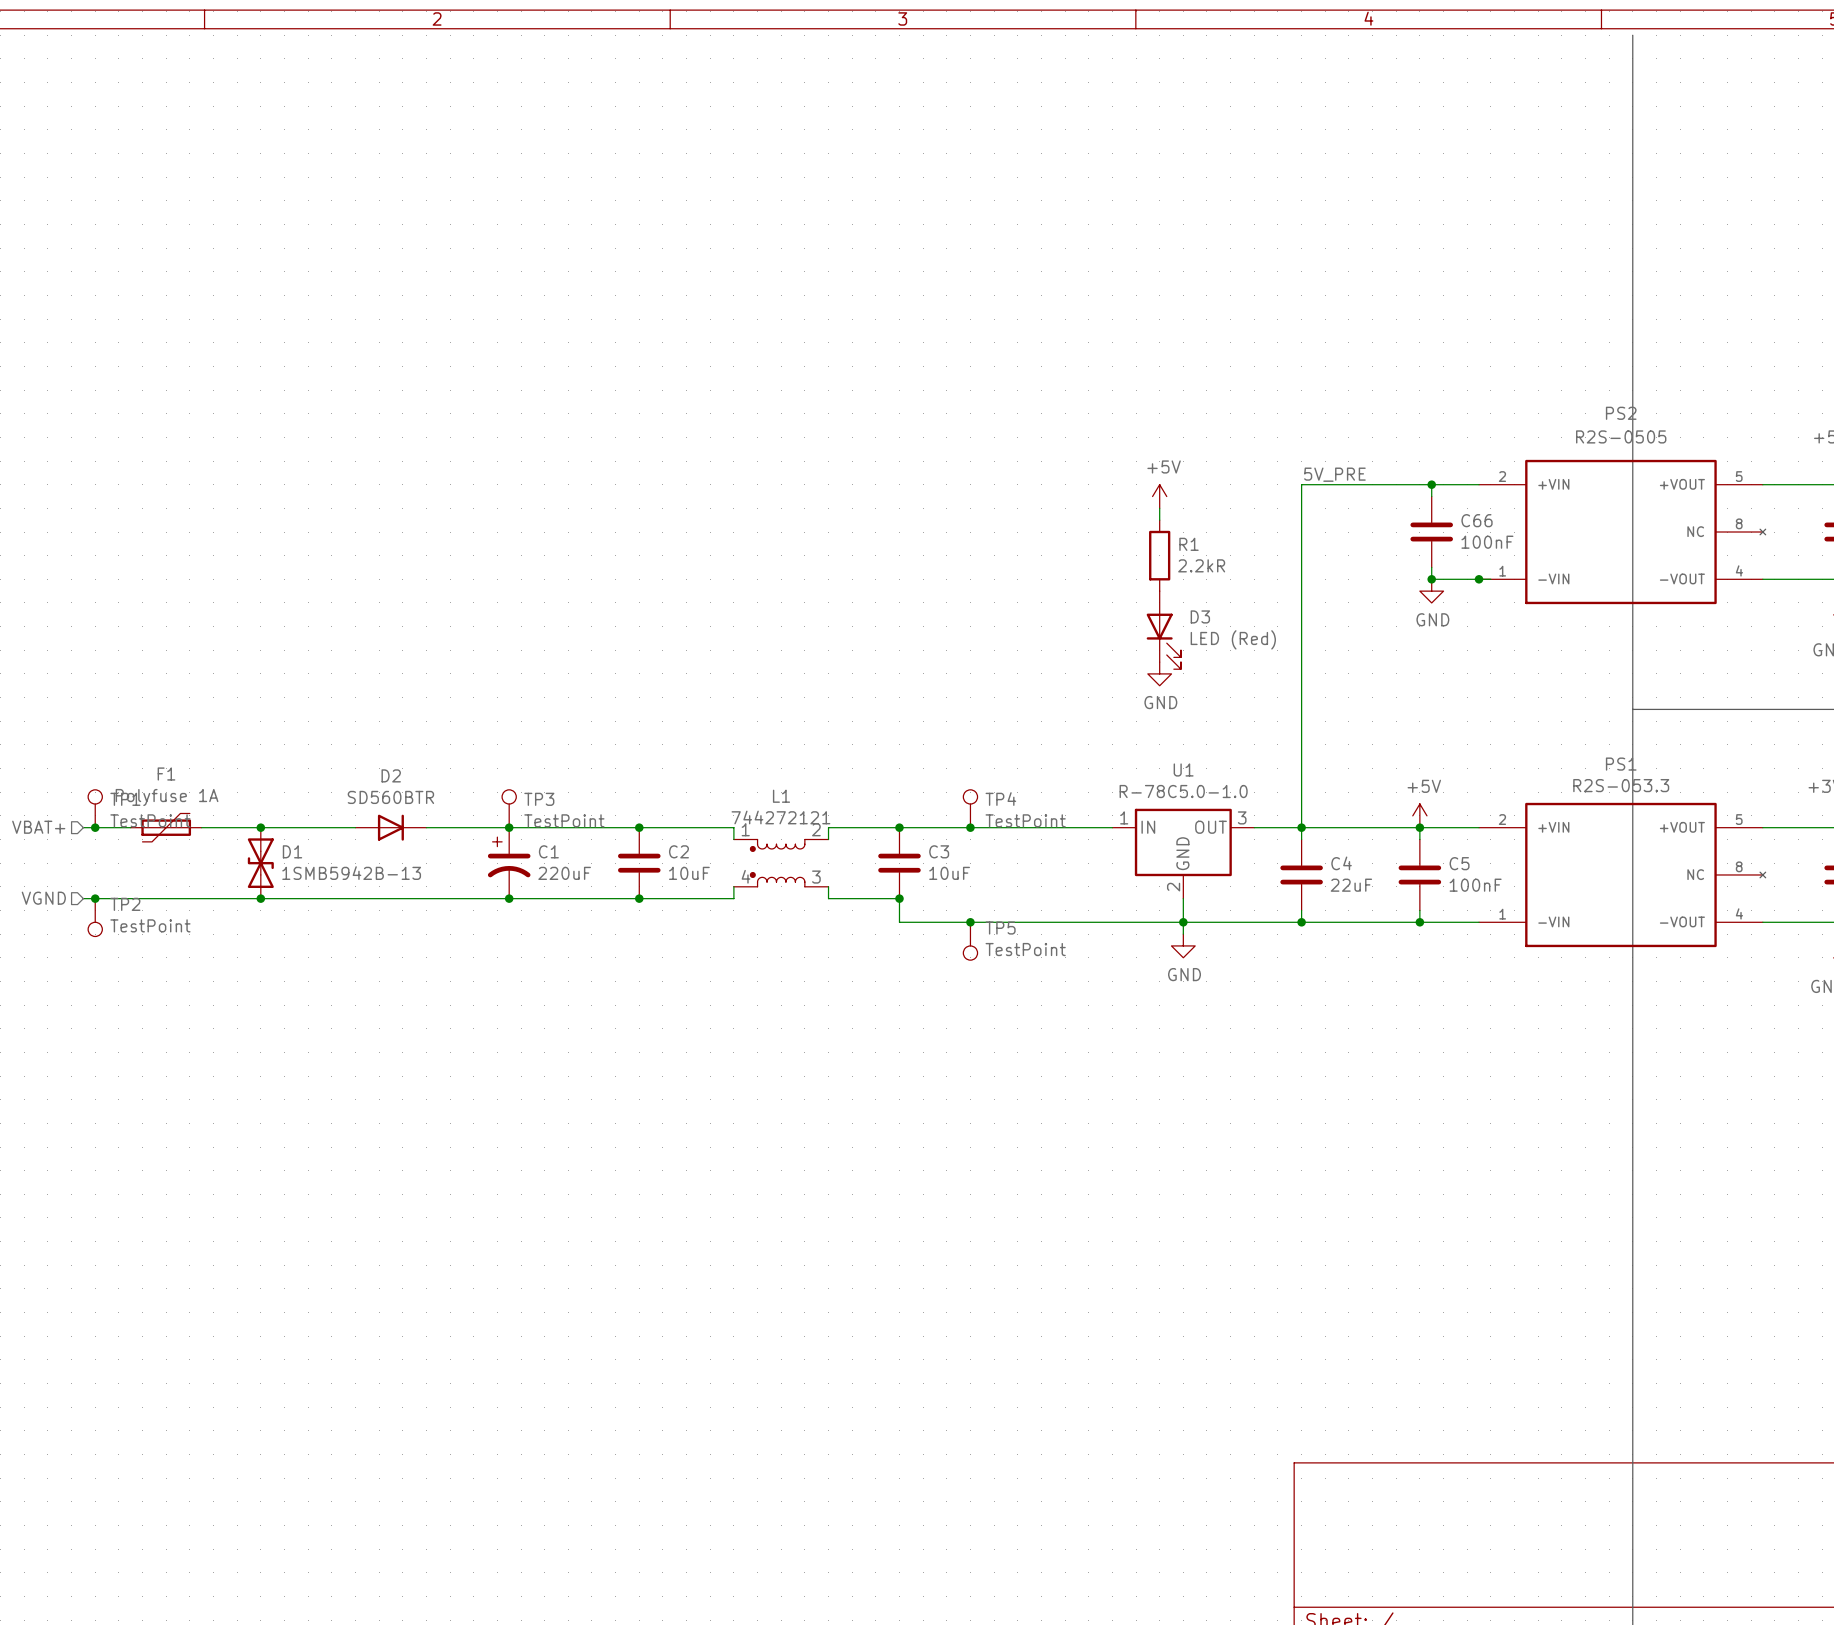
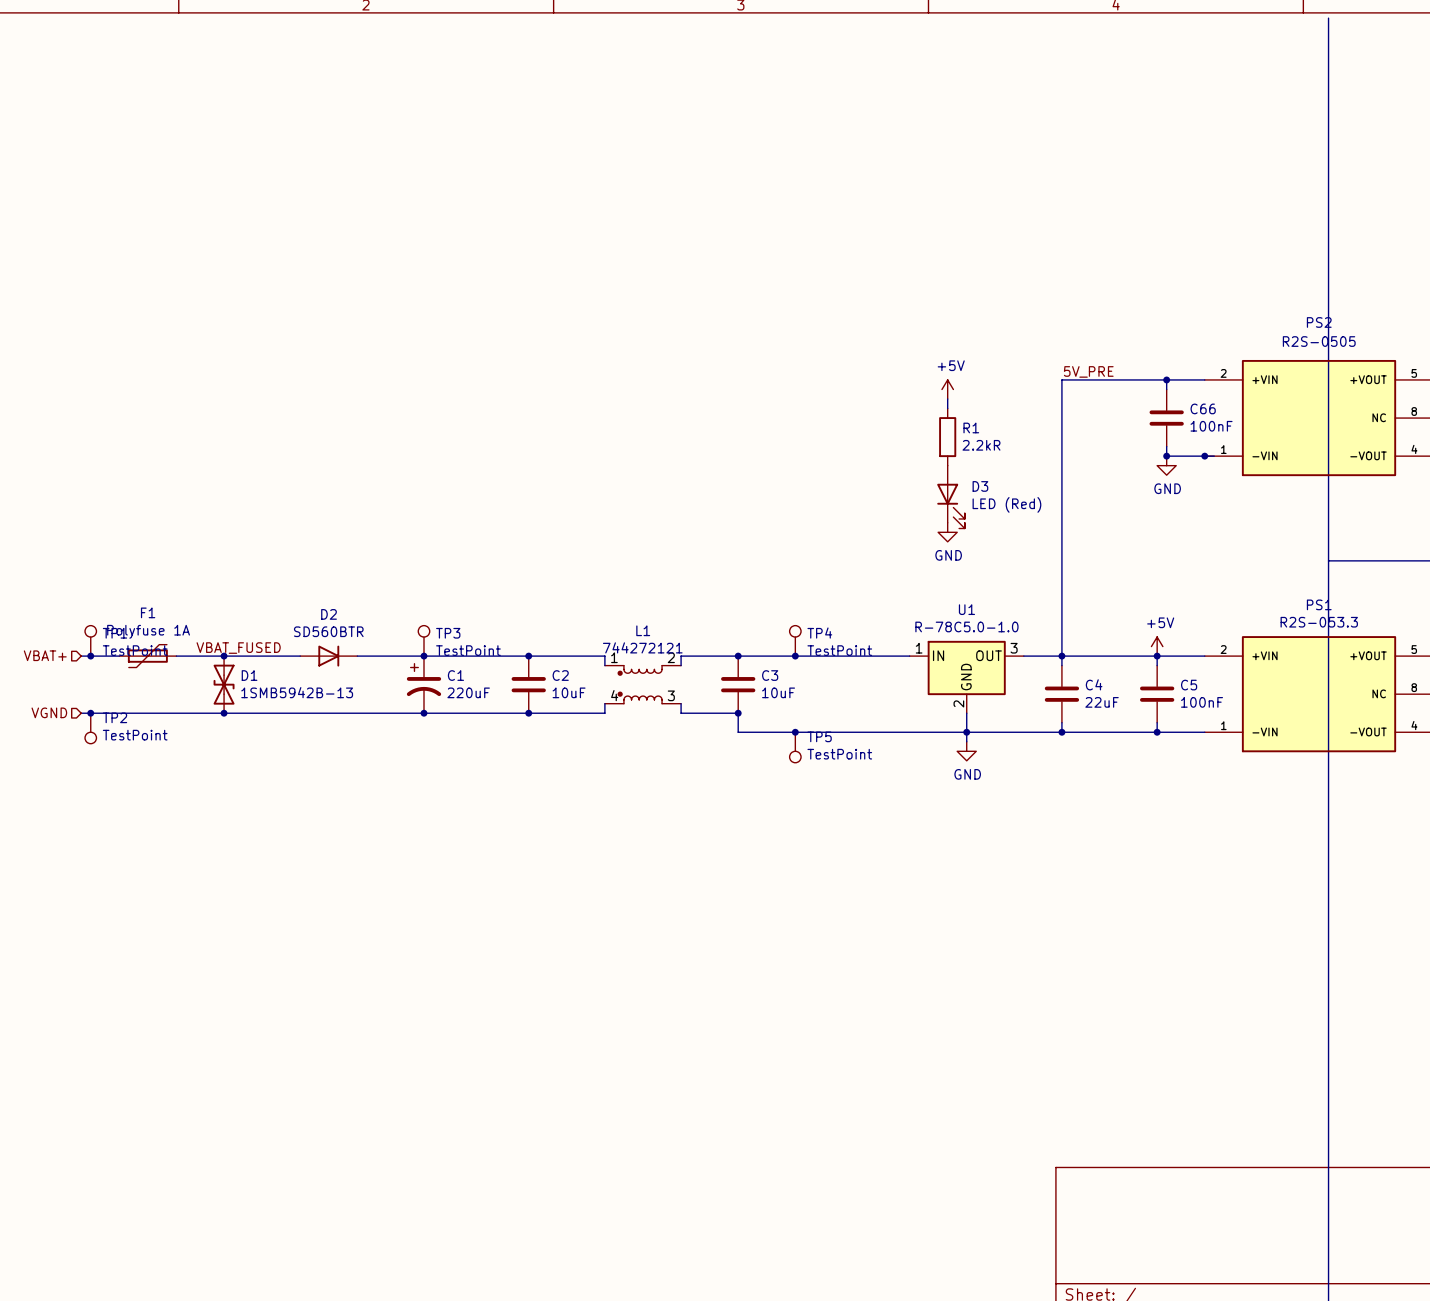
label: none -> VBAT_FUSED (238, 648)

